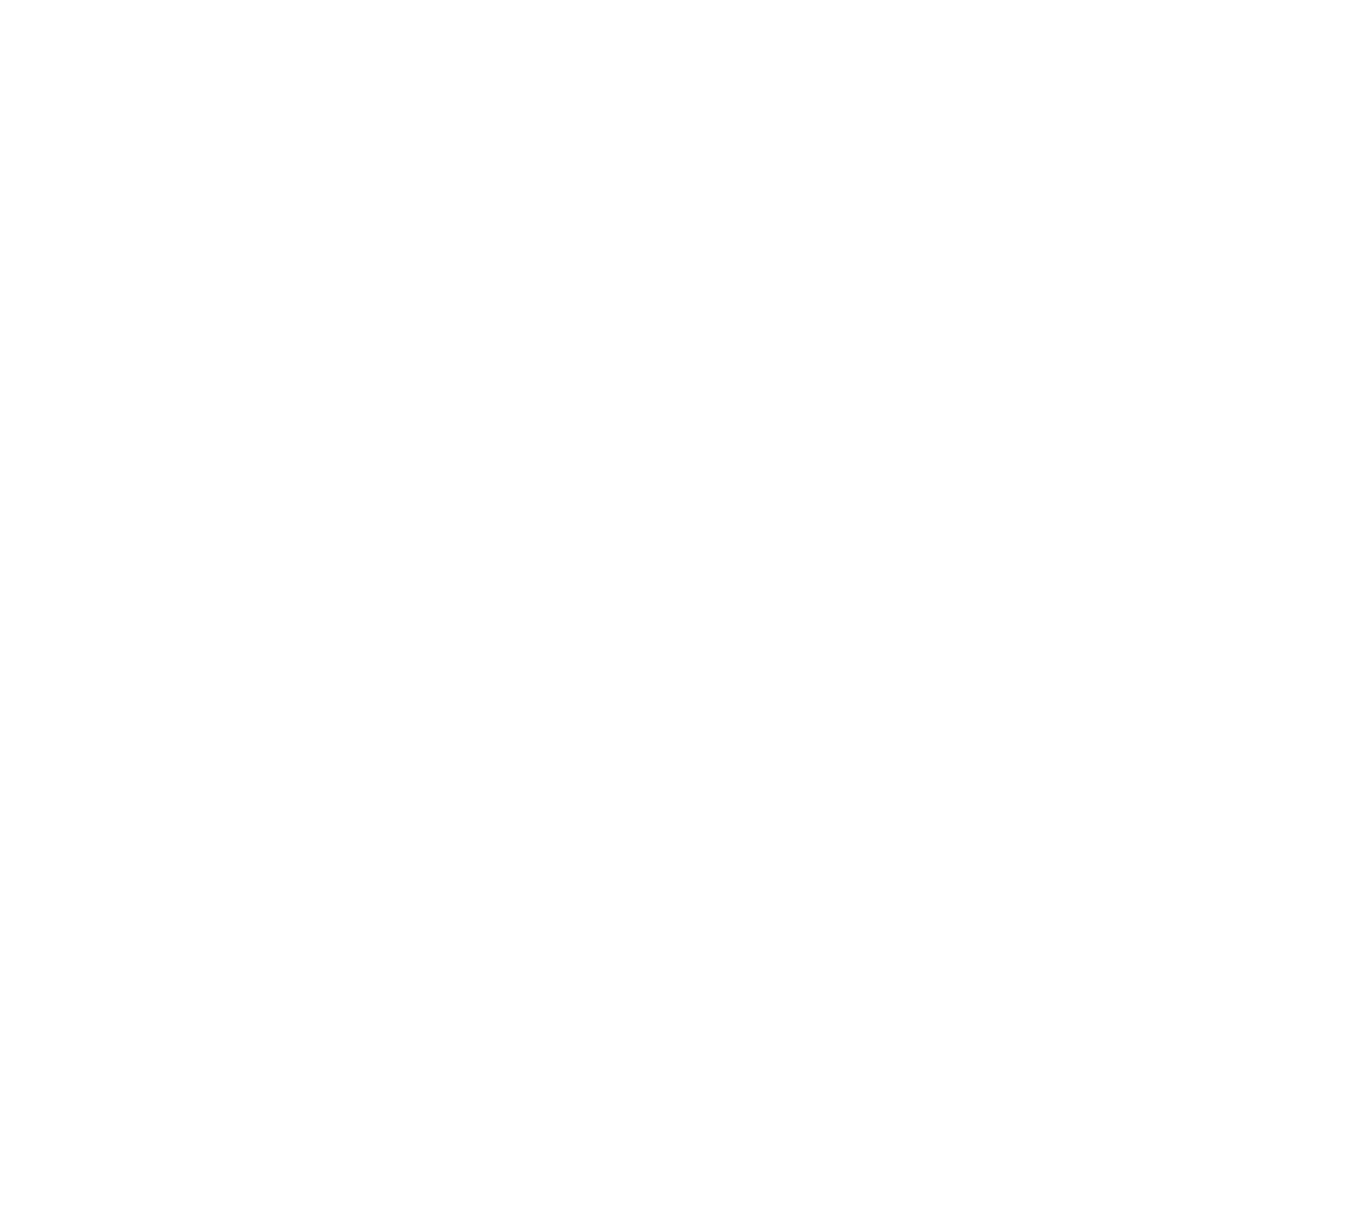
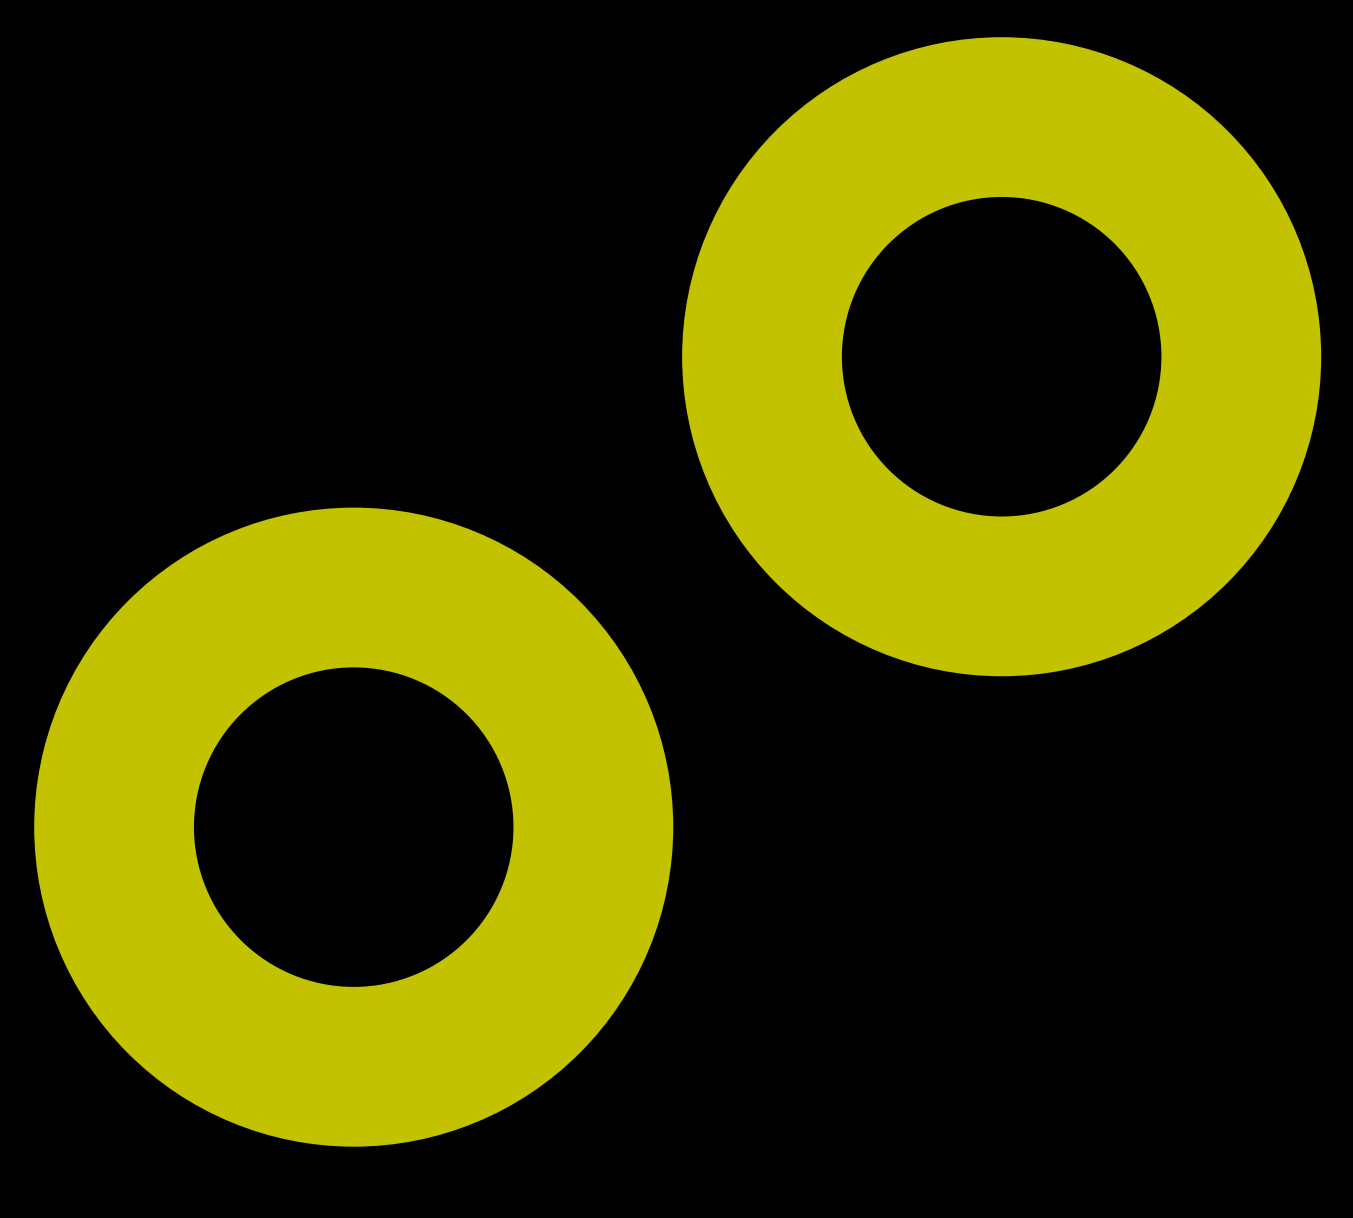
part: none -> (1001, 356)
part: none -> (353, 827)

